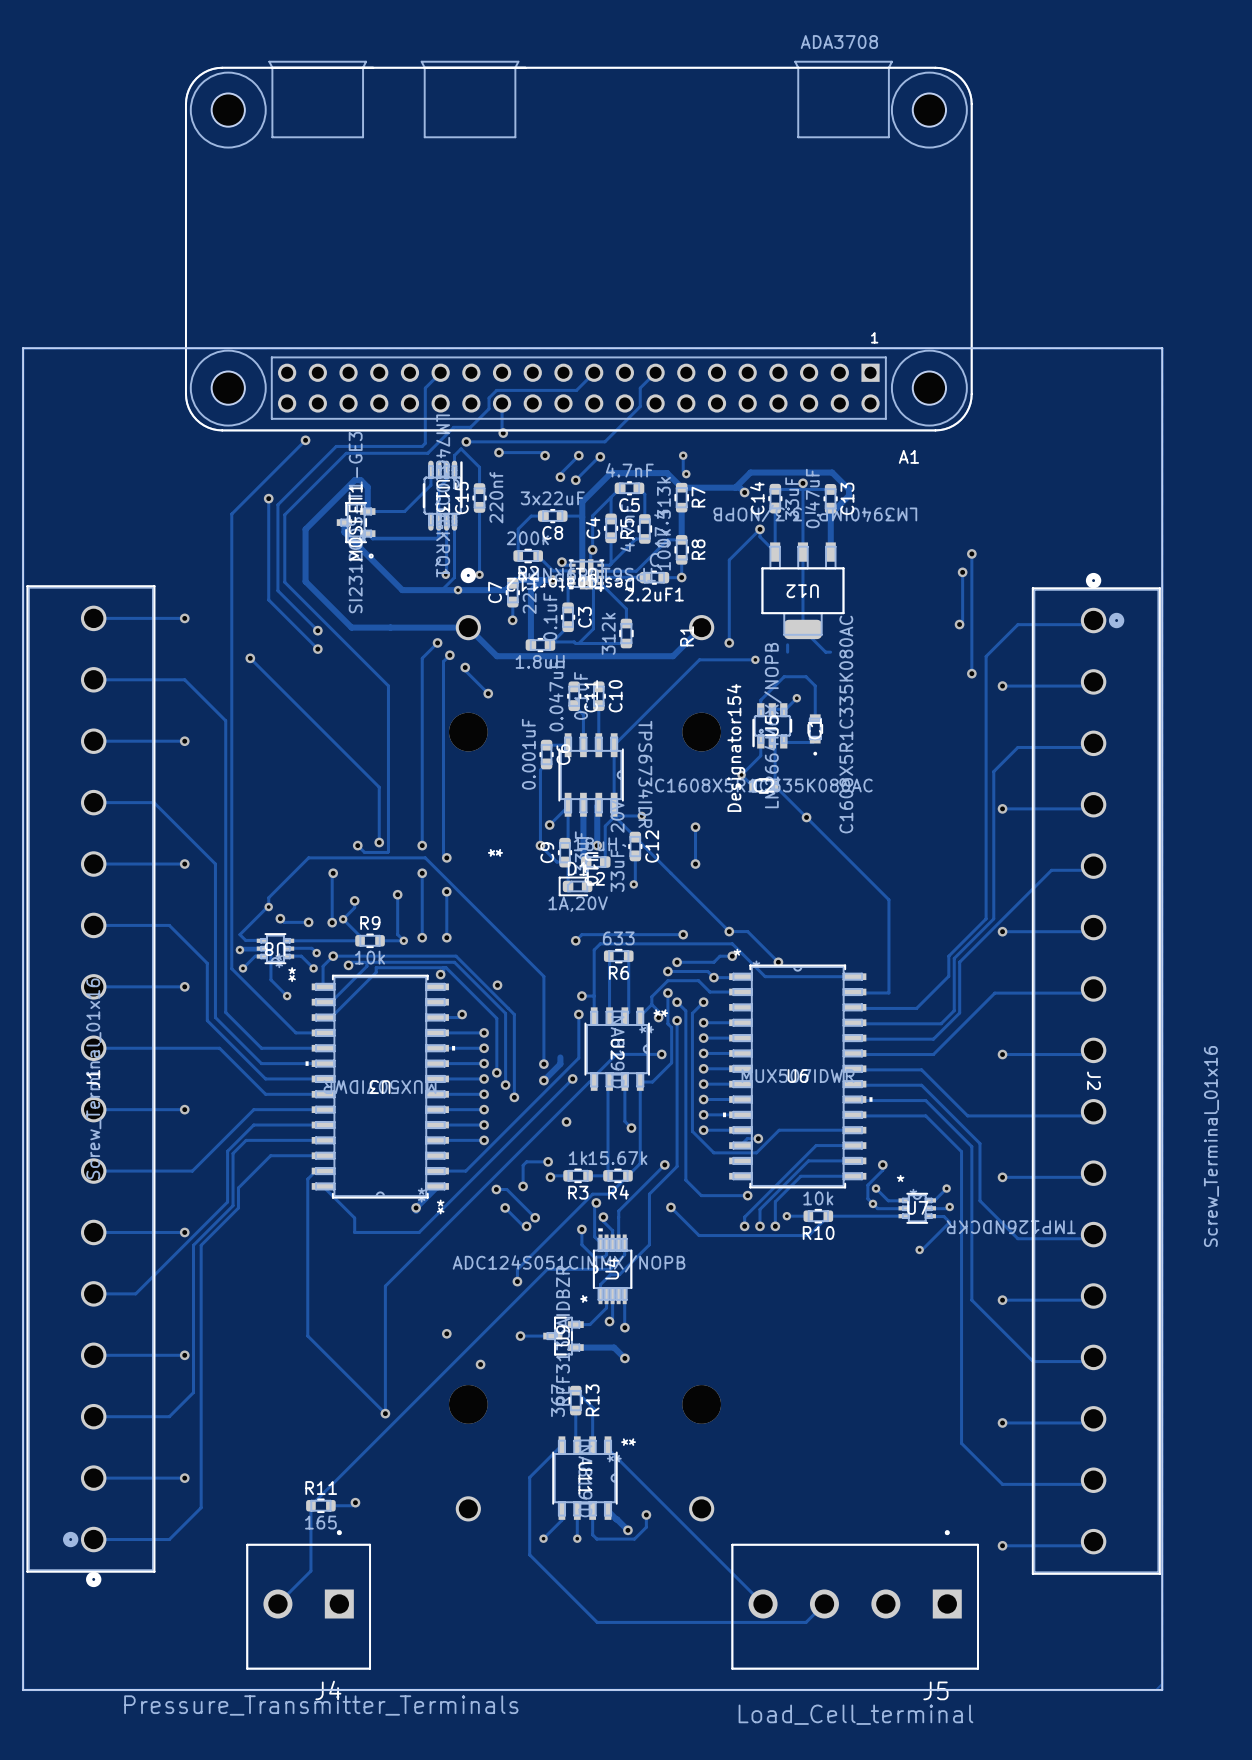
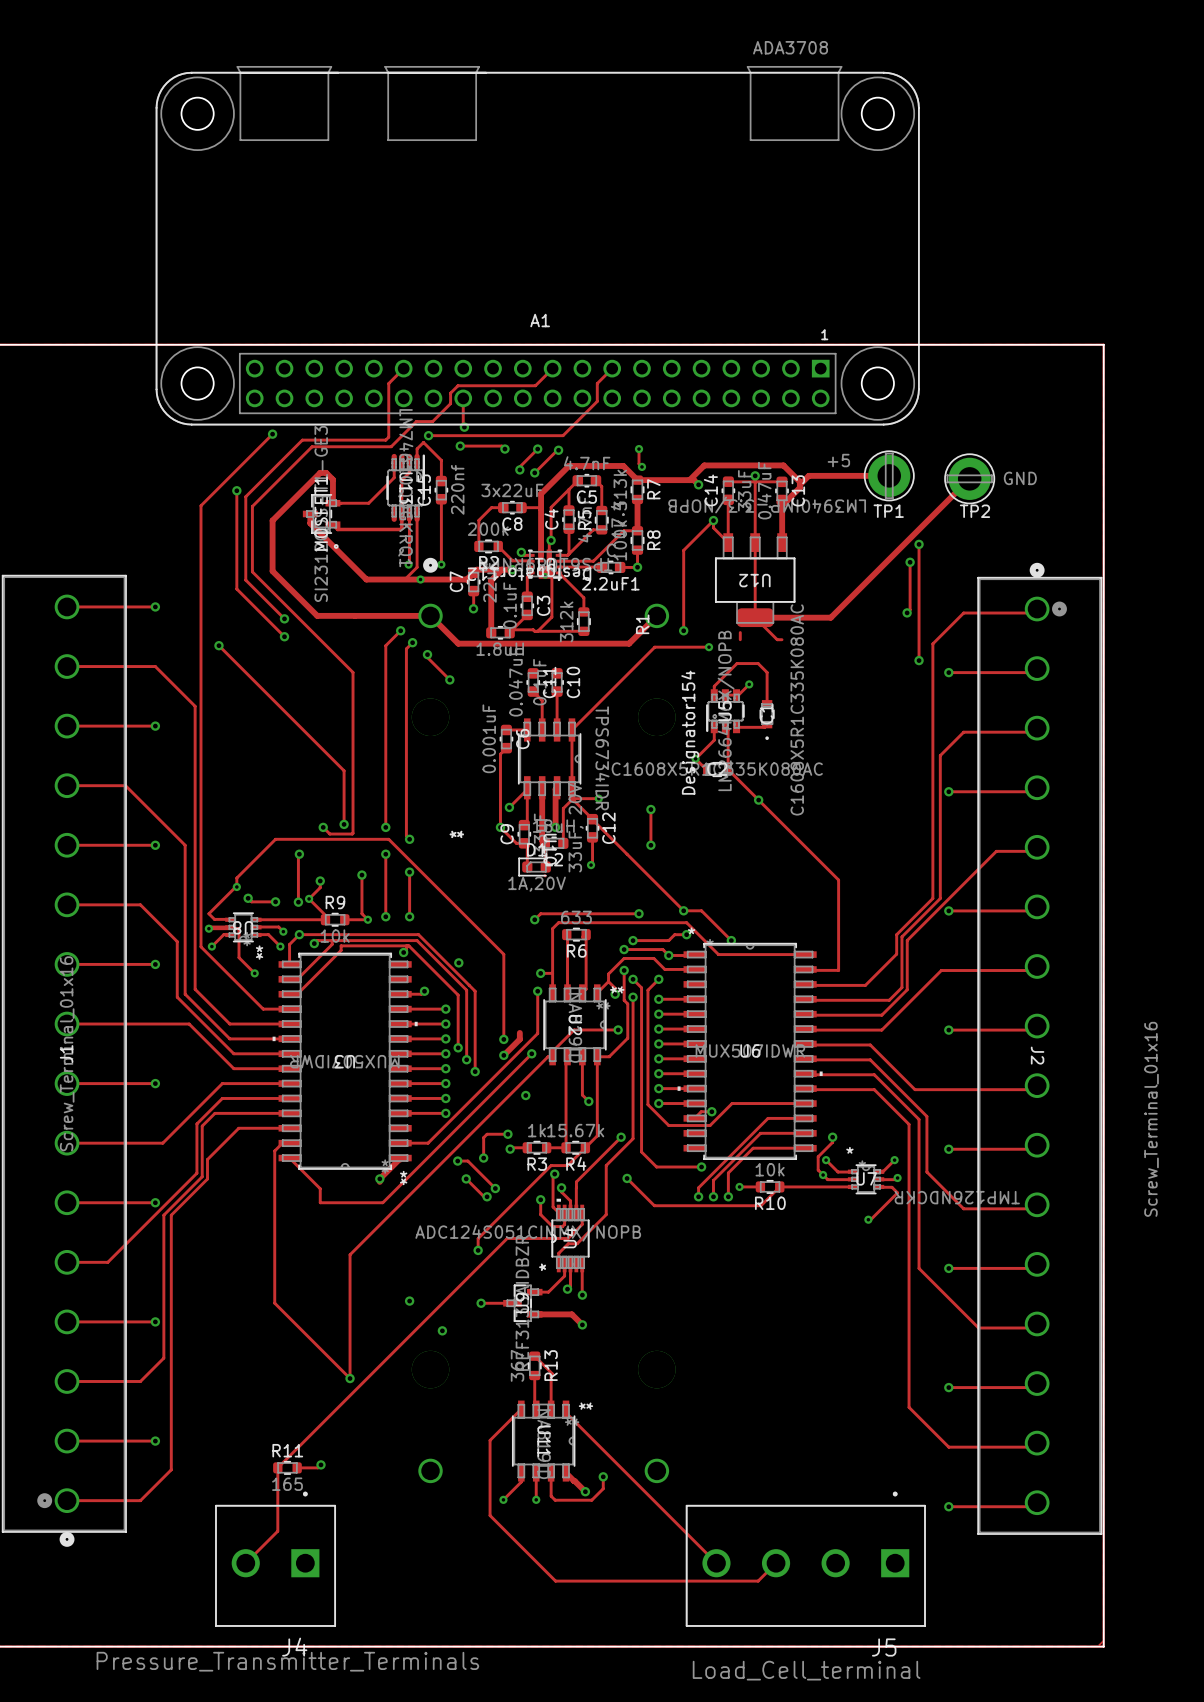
A1 name position: A1 (908, 456) -> A1 (540, 320)
track: none -> (889, 475) (808, 475) (799, 484)
TP1: none -> +5 (889, 475)
track: none -> (969, 478) (830, 617) (755, 617)
TP2: none -> GND (969, 478)

